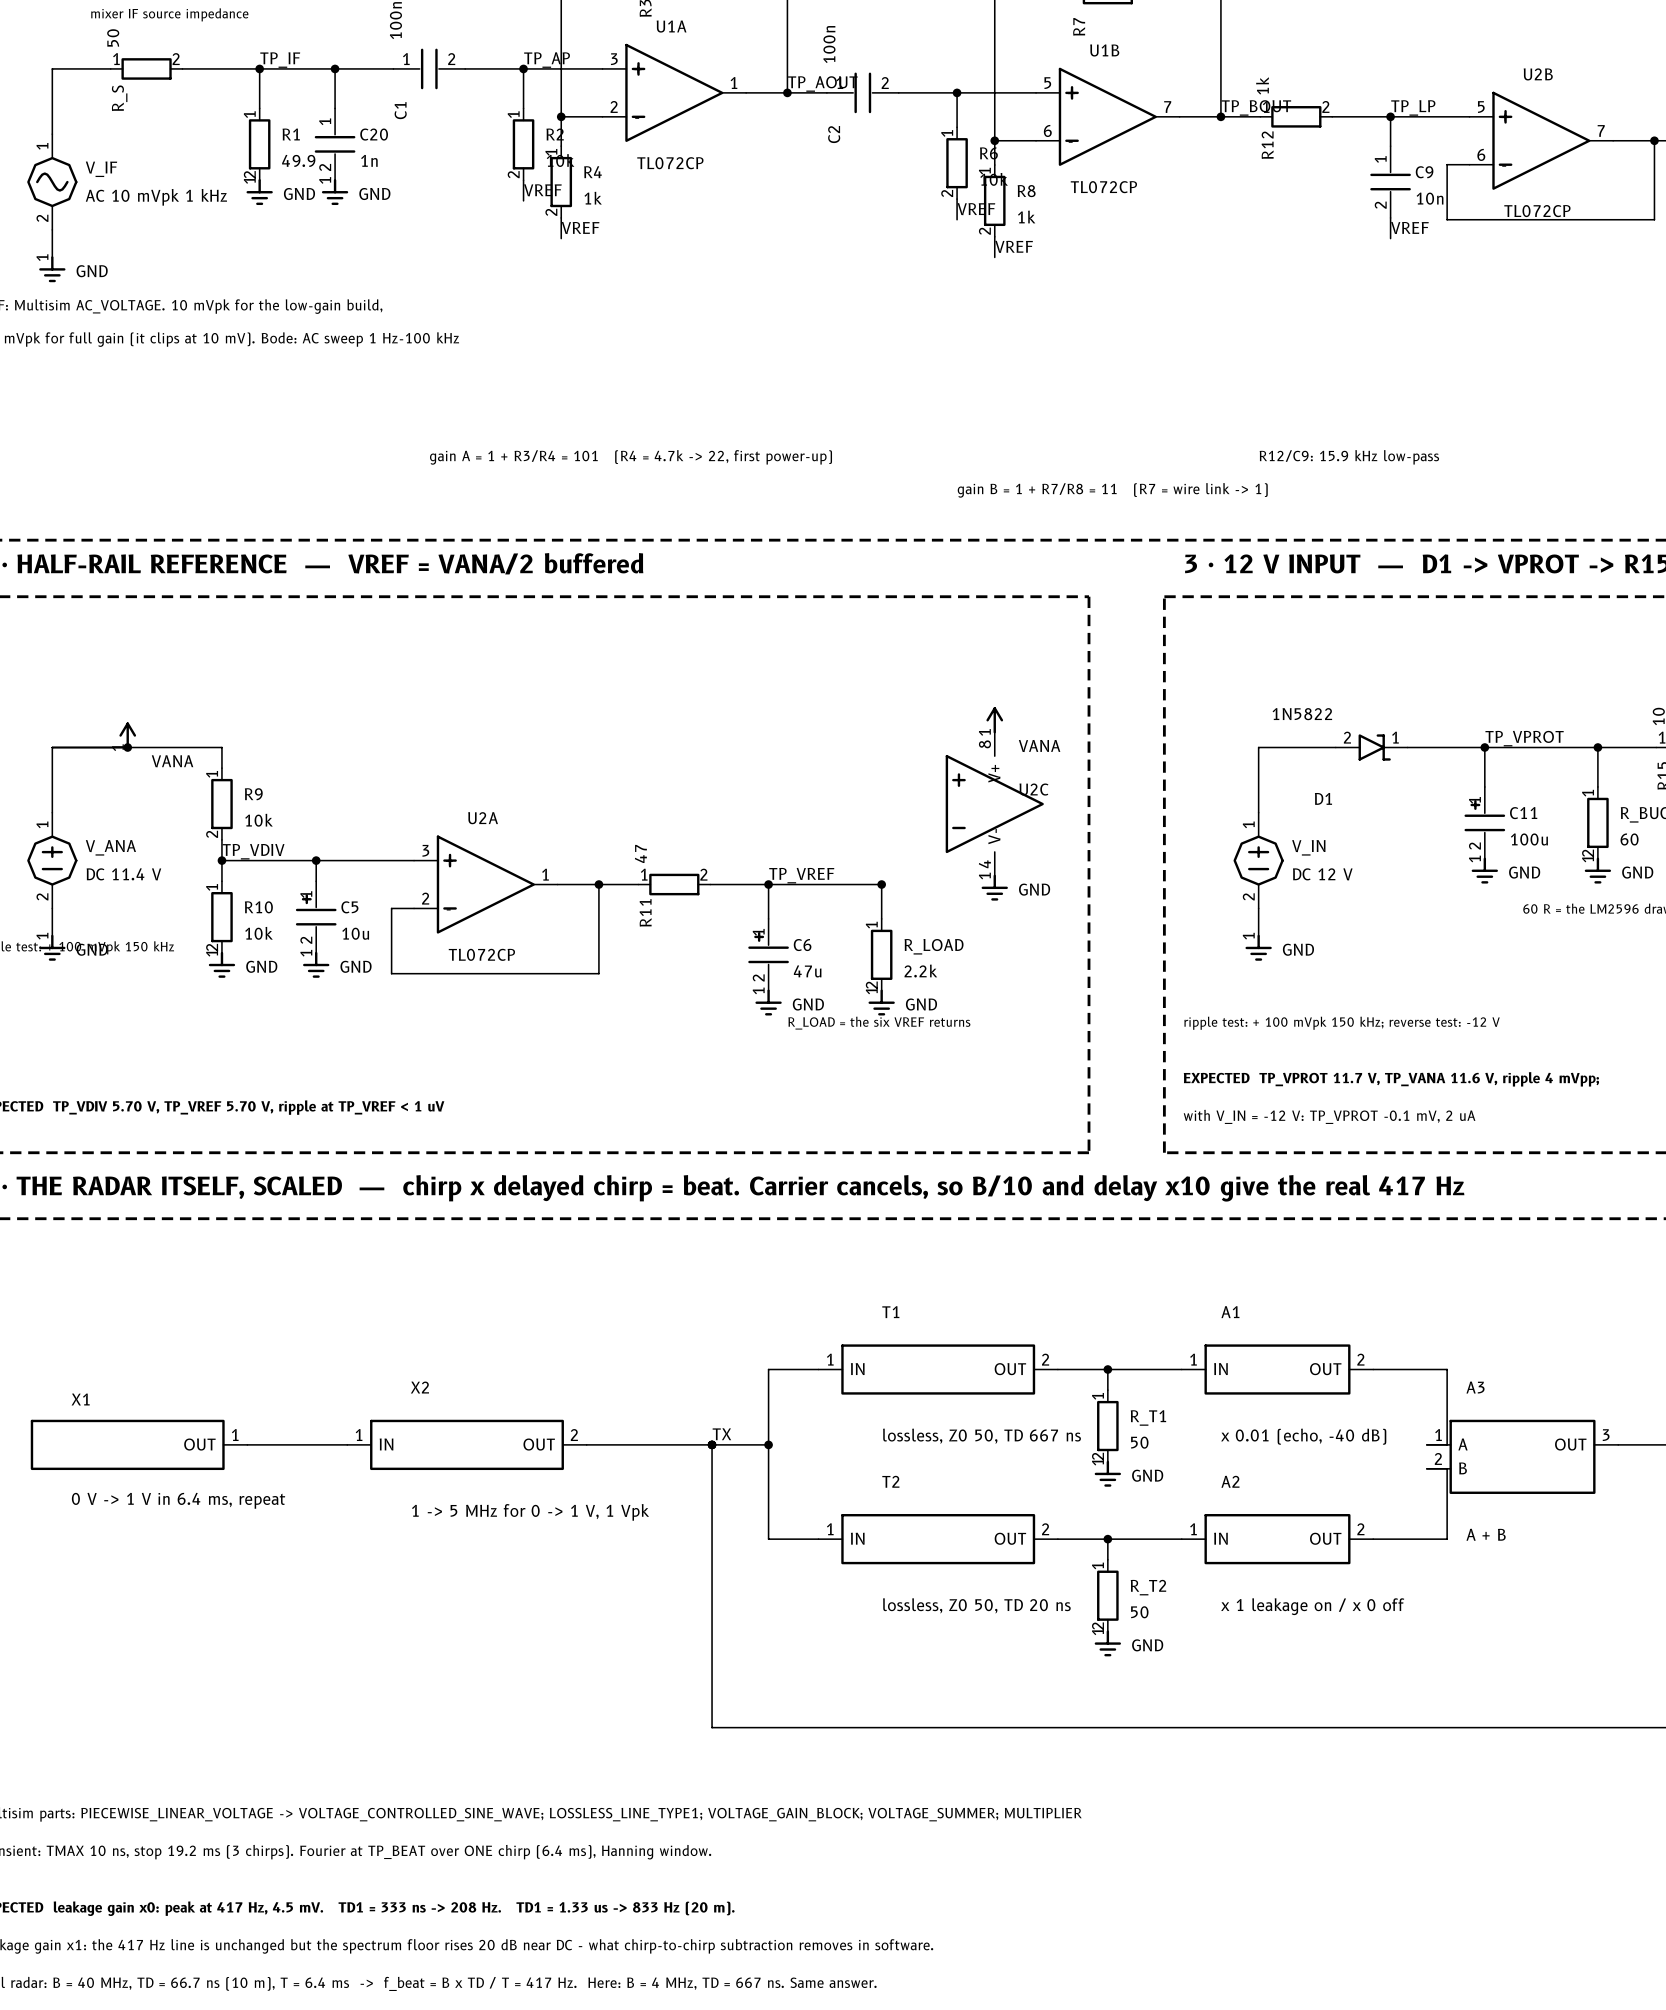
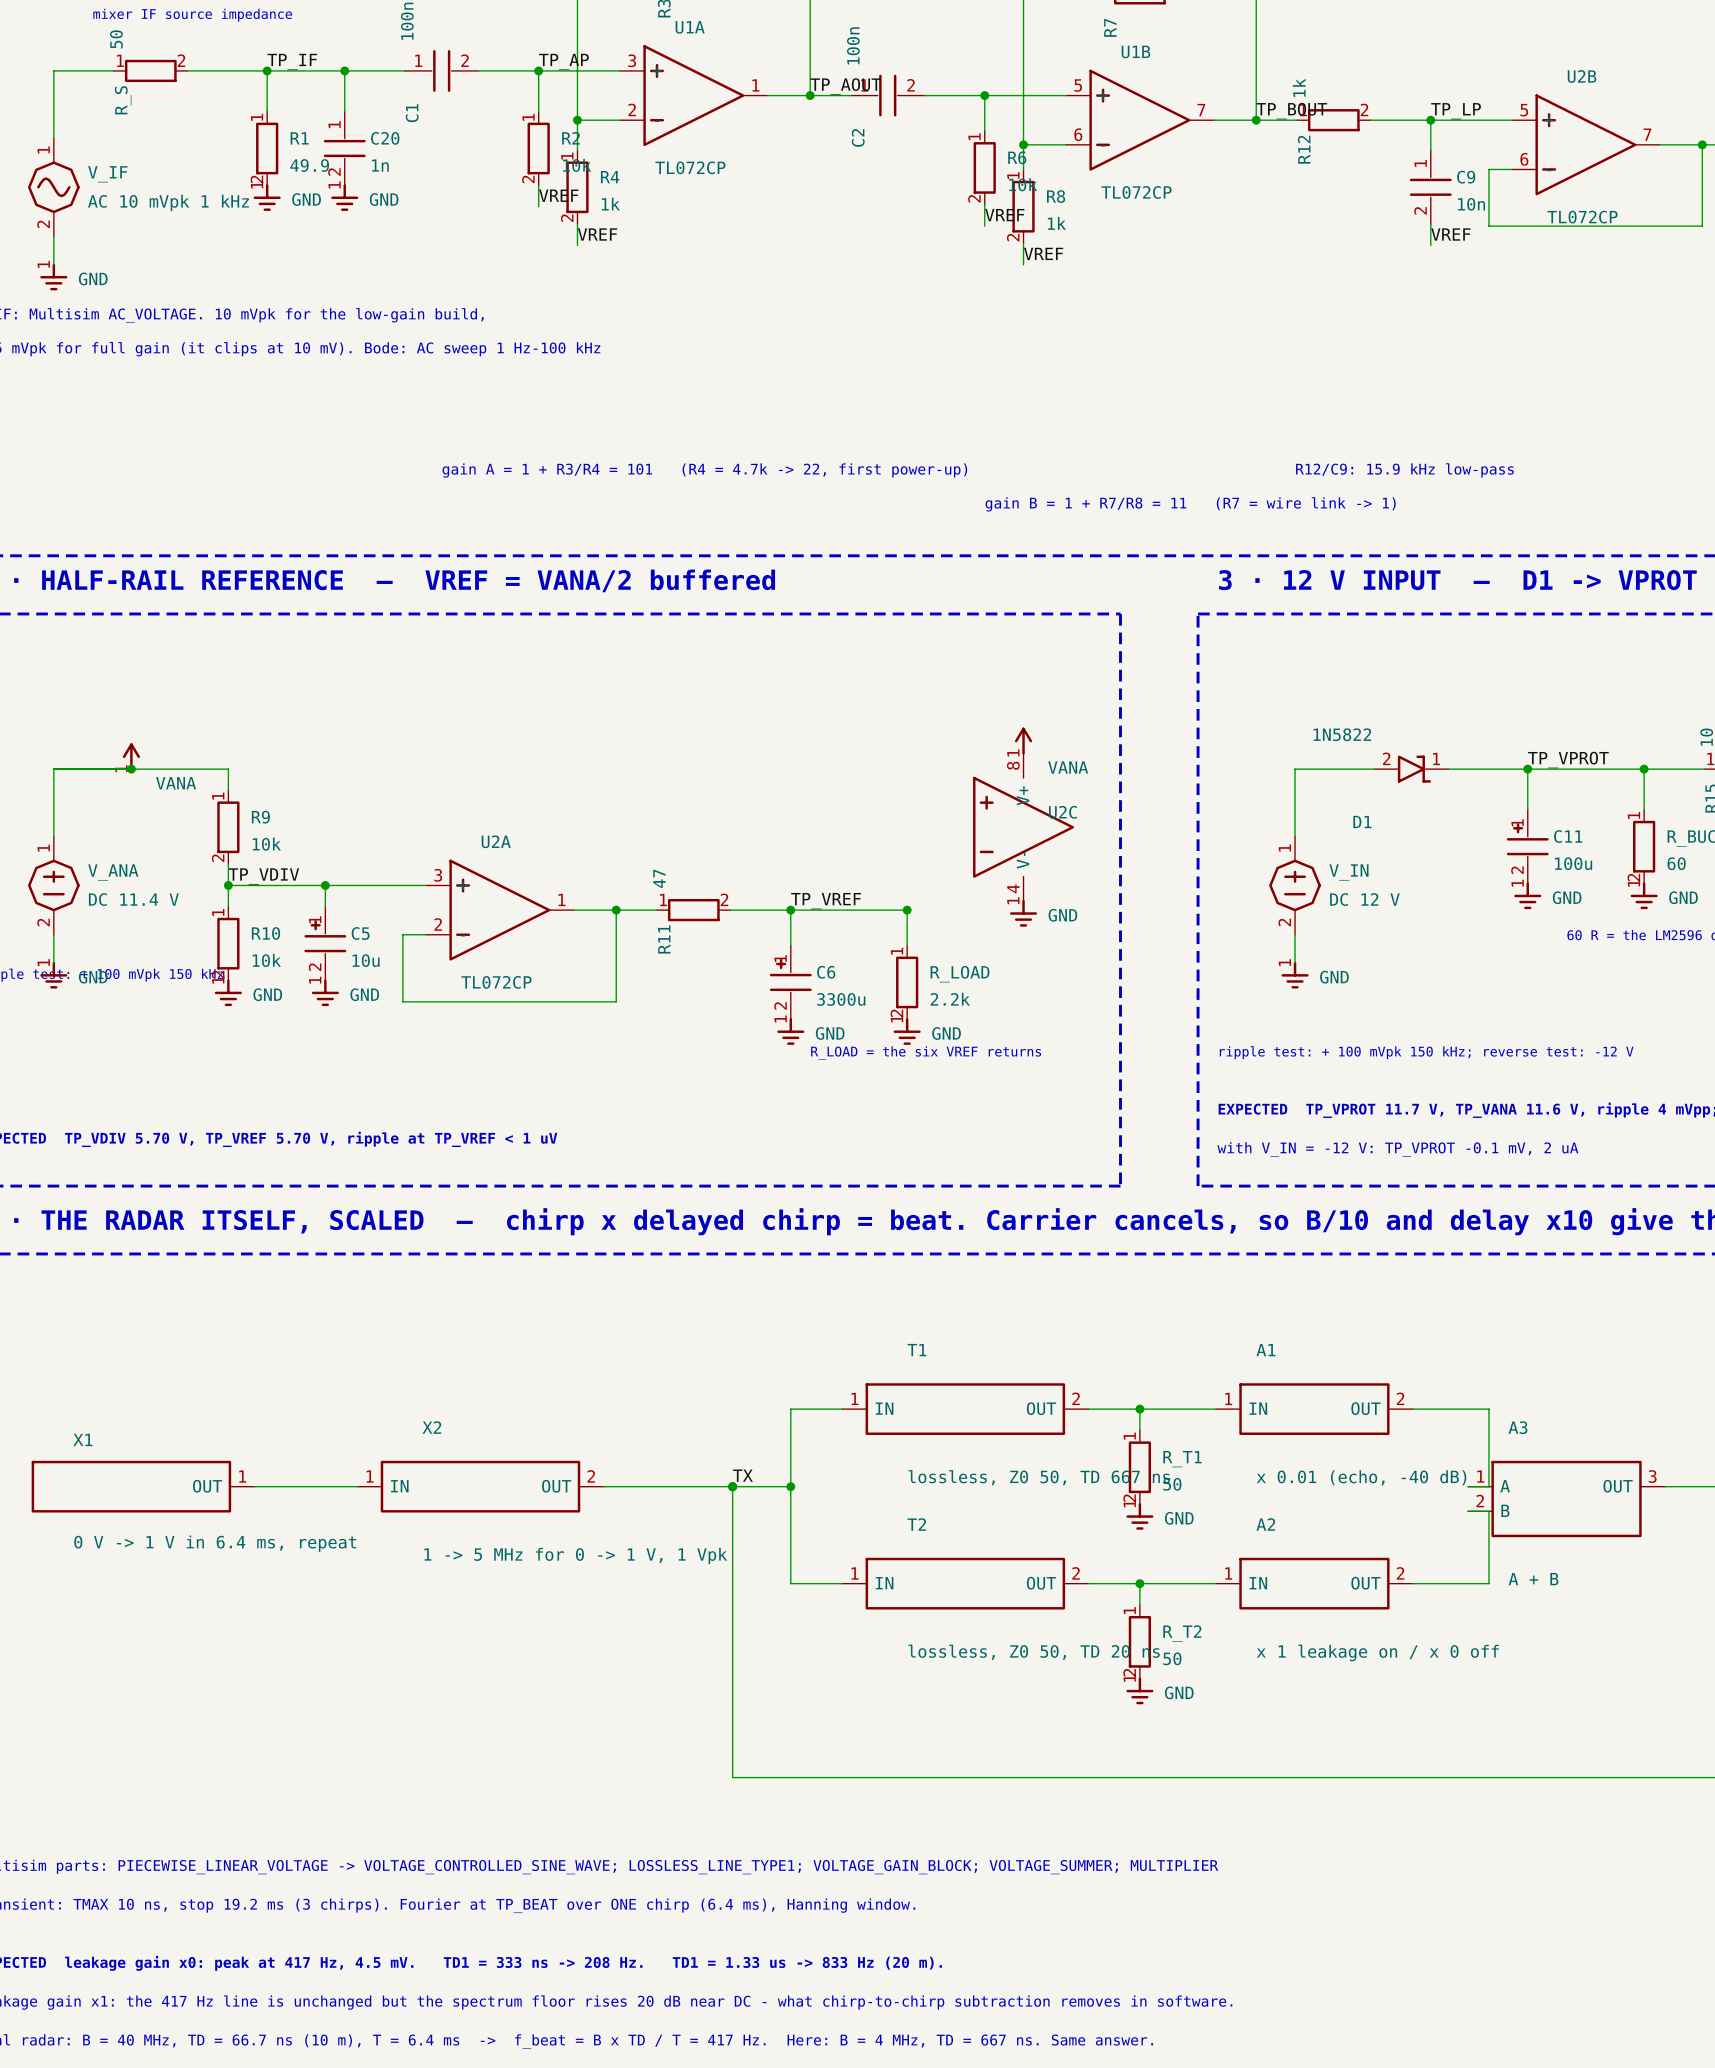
C6 value: 47u (807, 971) -> 3300u (841, 999)

